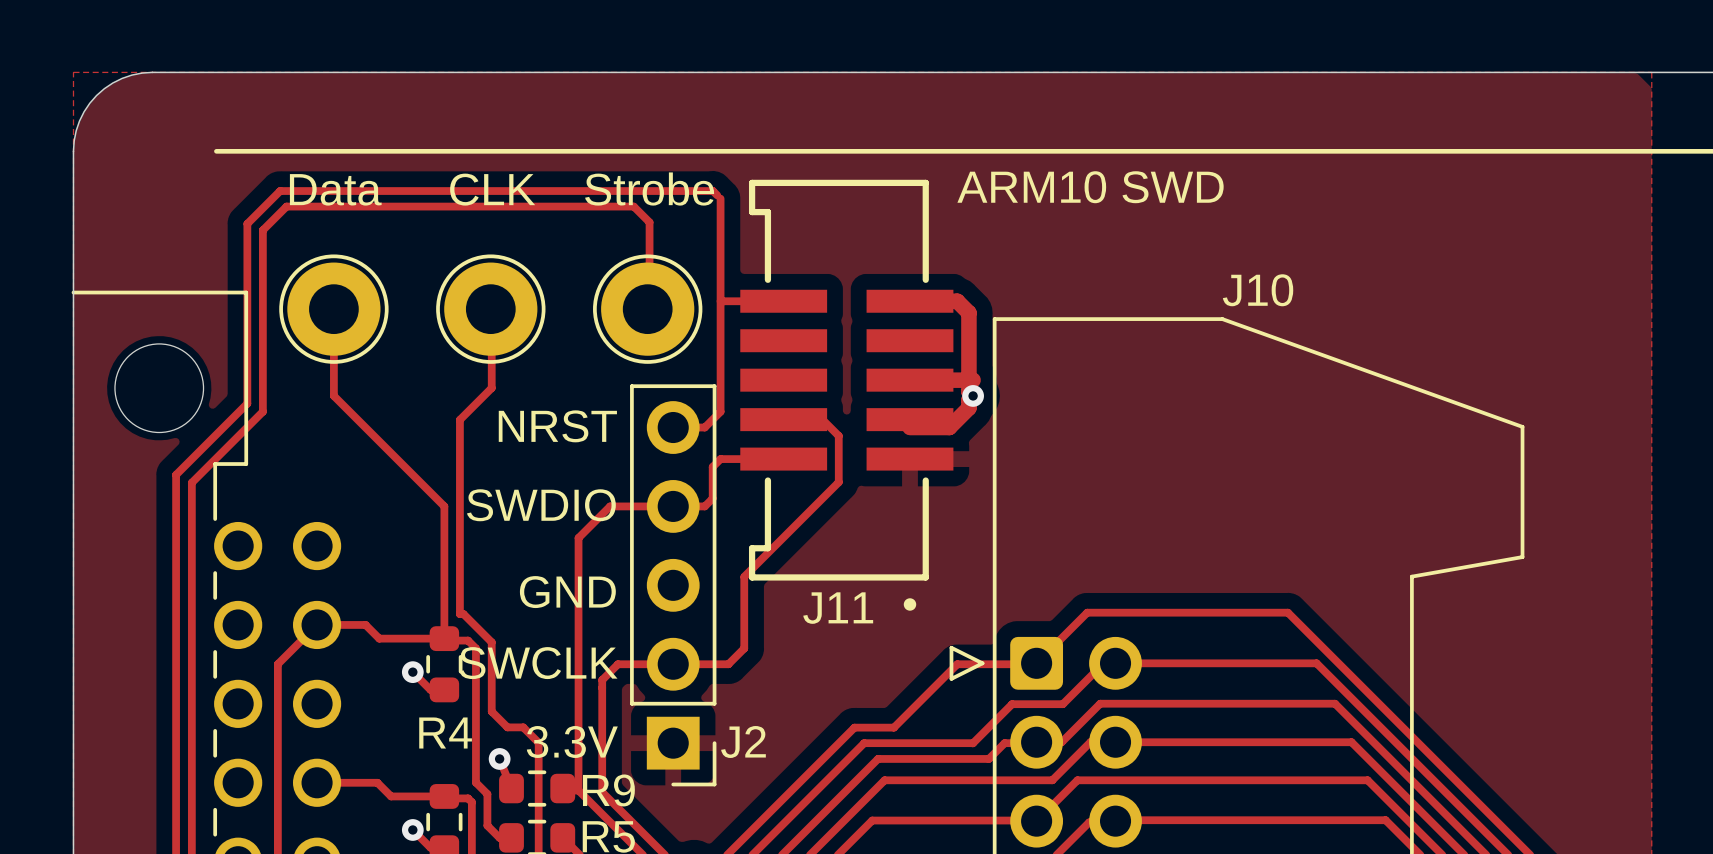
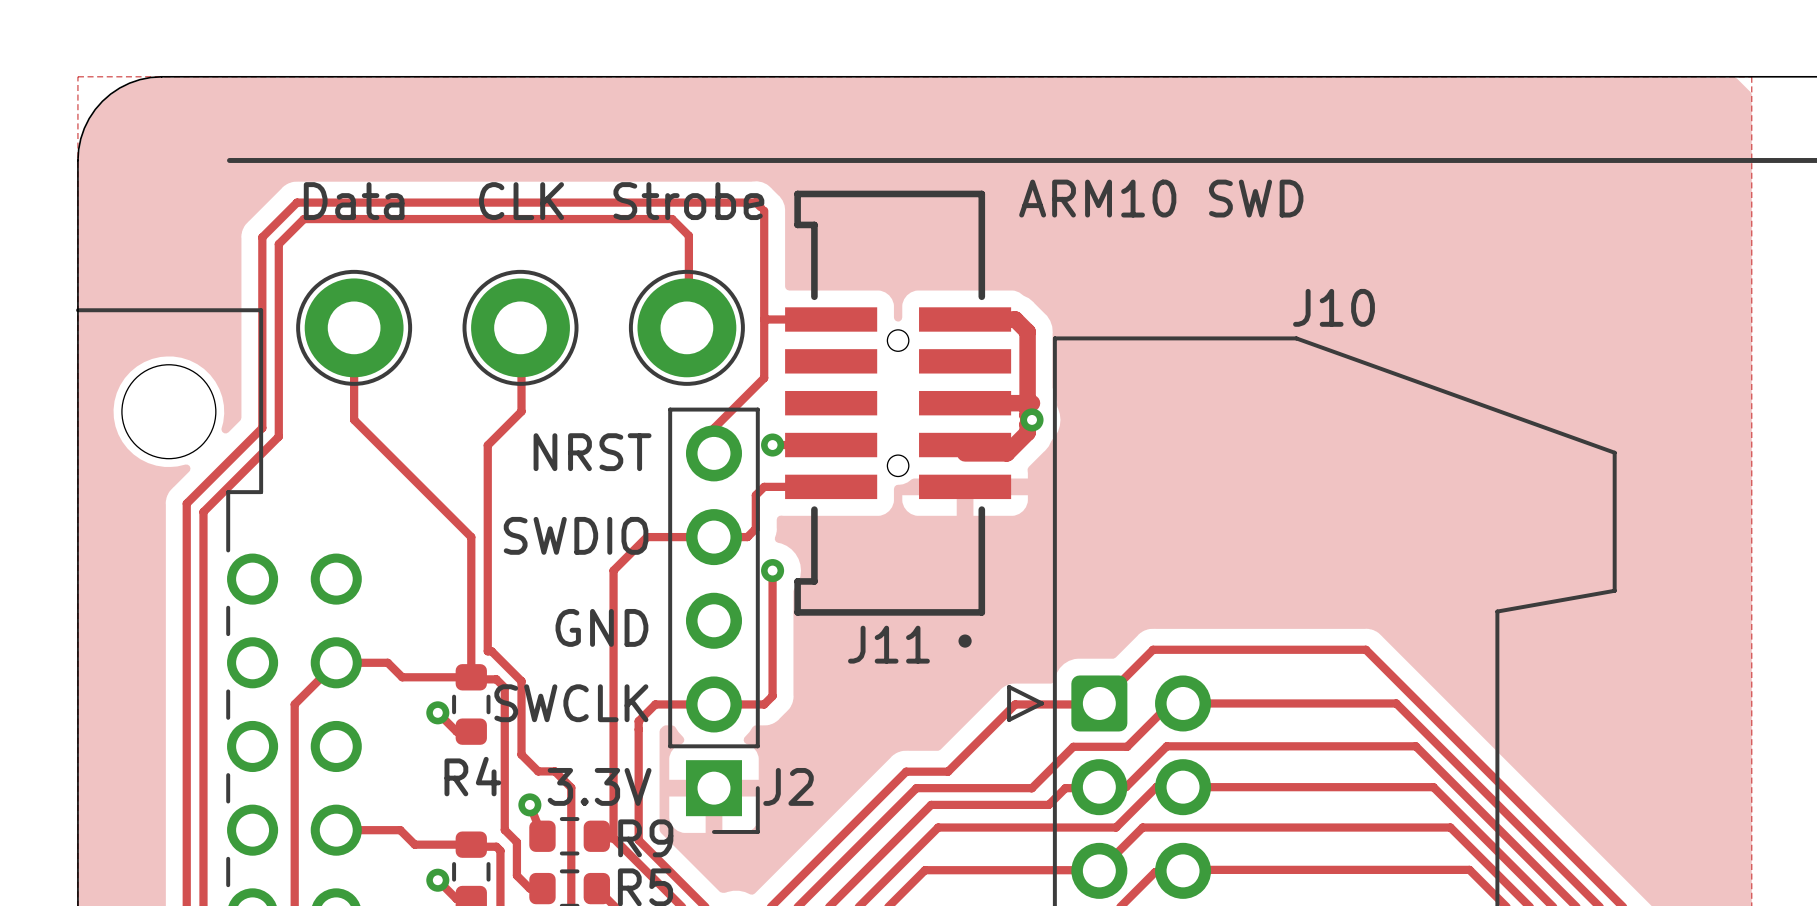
J11 footprint: [740, 179, 954, 611] -> [785, 190, 1012, 648]
track: (720, 356) (720, 411) (704, 427) (673, 427) -> (764, 378) (713, 428) (713, 453)
via: none -> (772, 445)
track: (822, 419) (838, 435) (838, 482) (744, 576) -> none
via: none -> (772, 570)
track: (744, 577) (744, 648) (728, 664) (720, 664) -> (772, 570) (772, 696) (764, 704)

